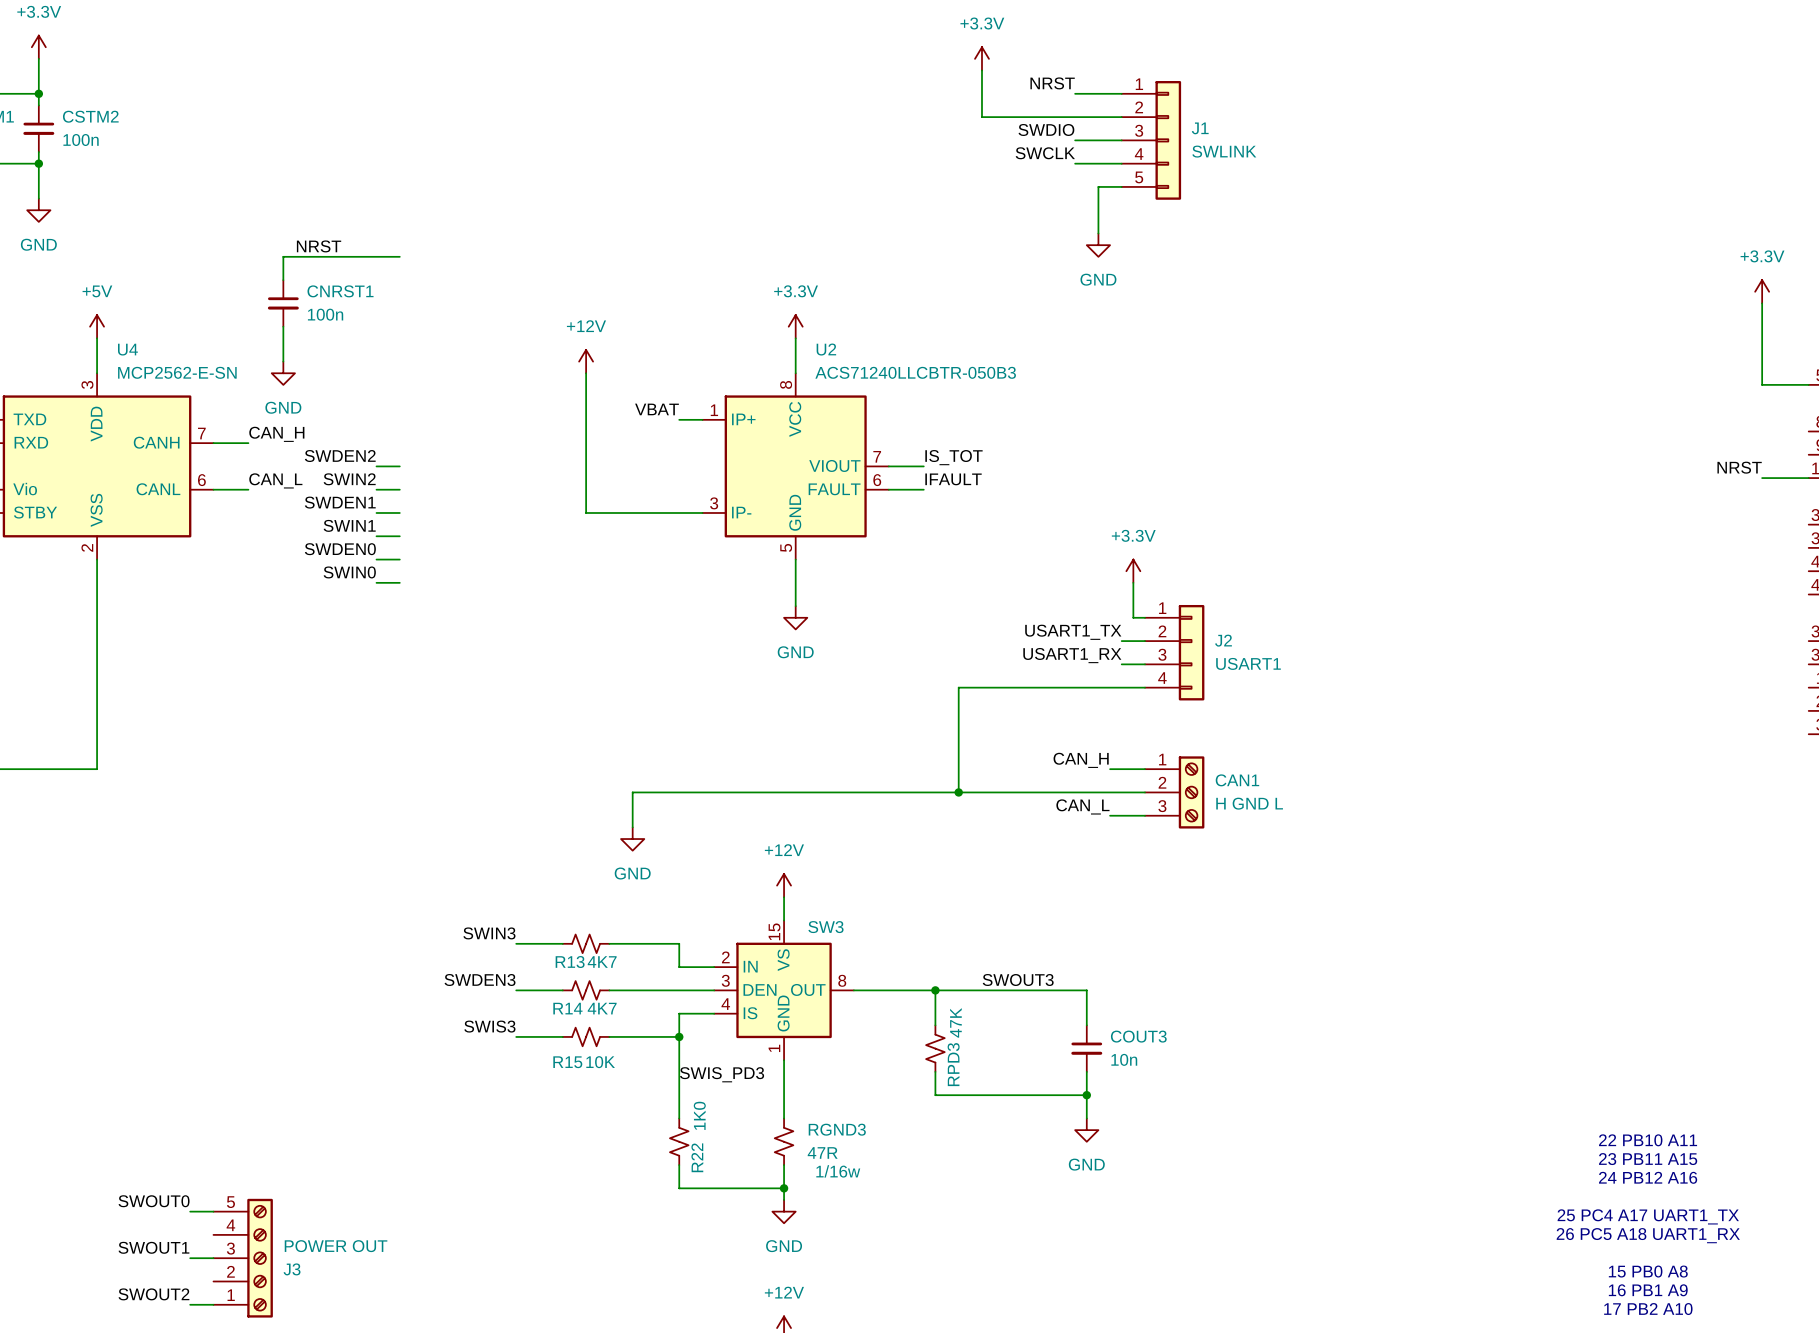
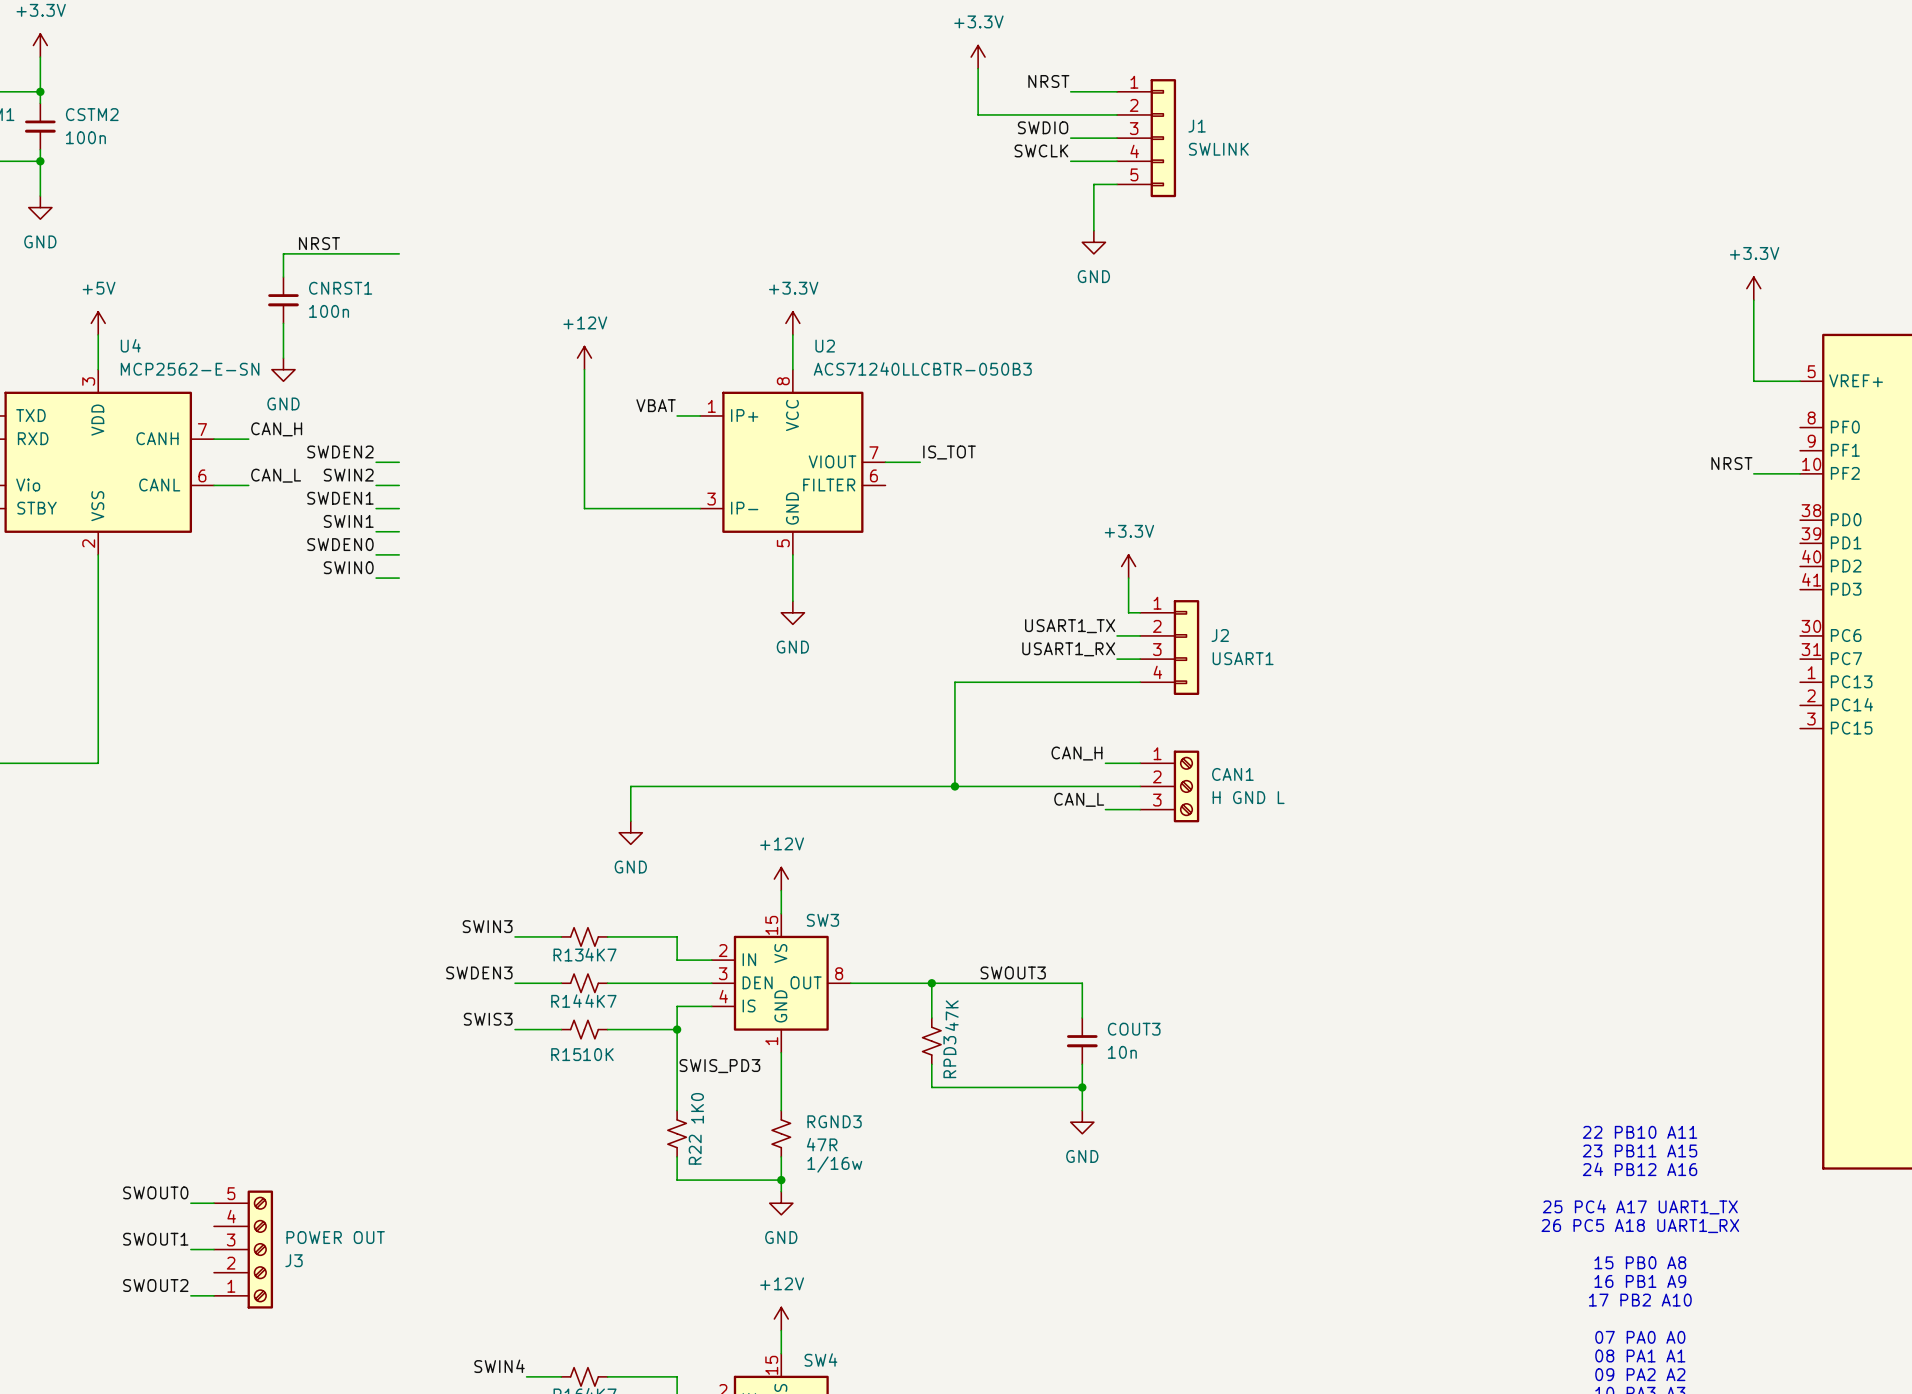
label: IFAULT (953, 479) -> none
U2 pin name: FAULT (834, 489) -> FILTER (829, 485)
wire: (888, 489) (923, 489) -> none

